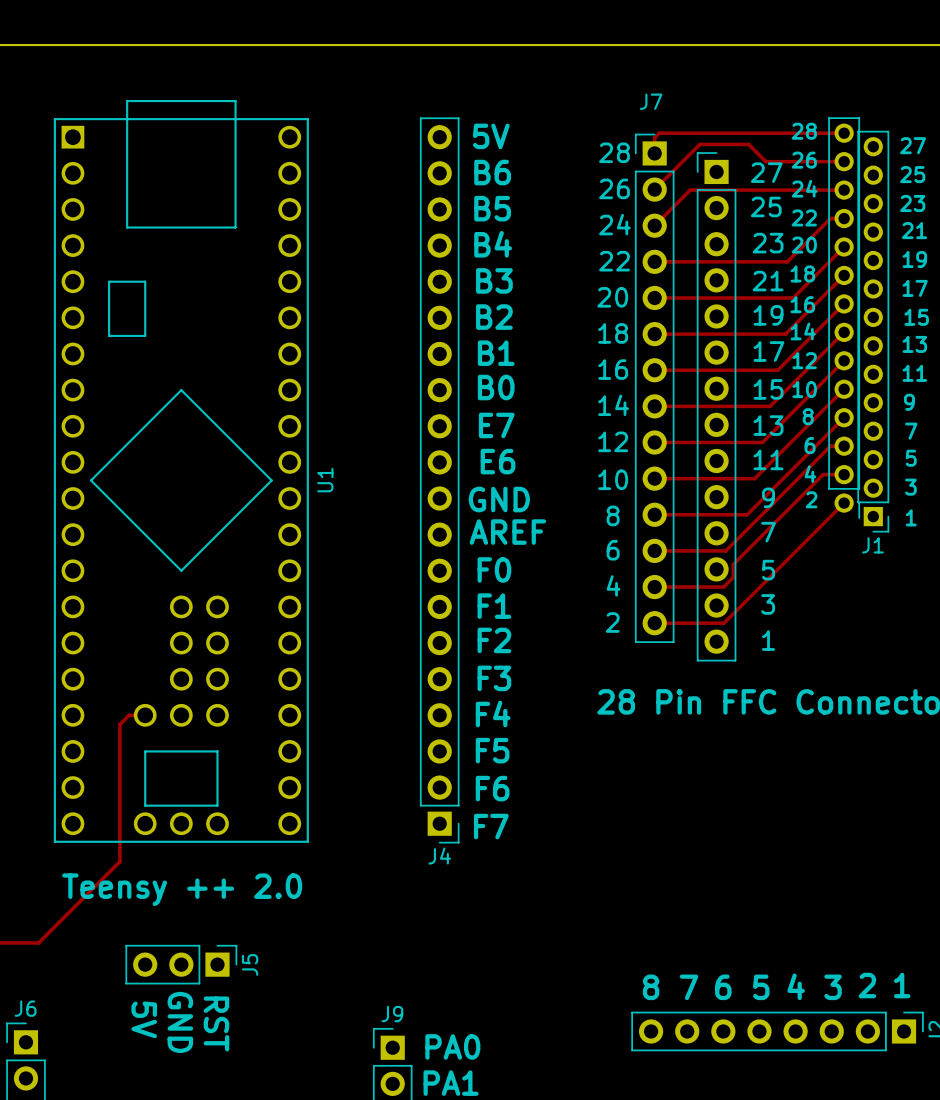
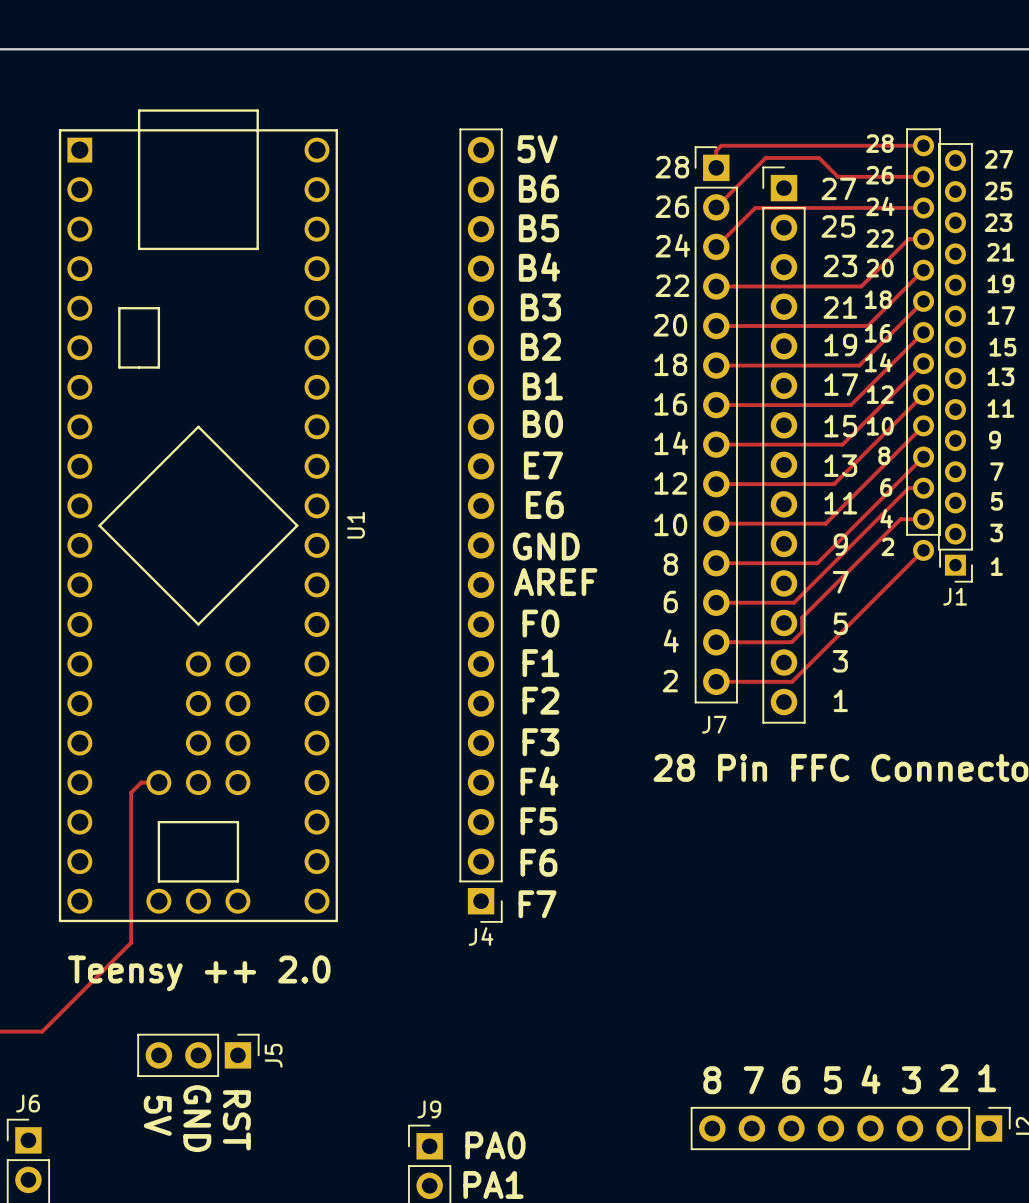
J7 name position: J7 (651, 101) -> J7 (714, 724)

